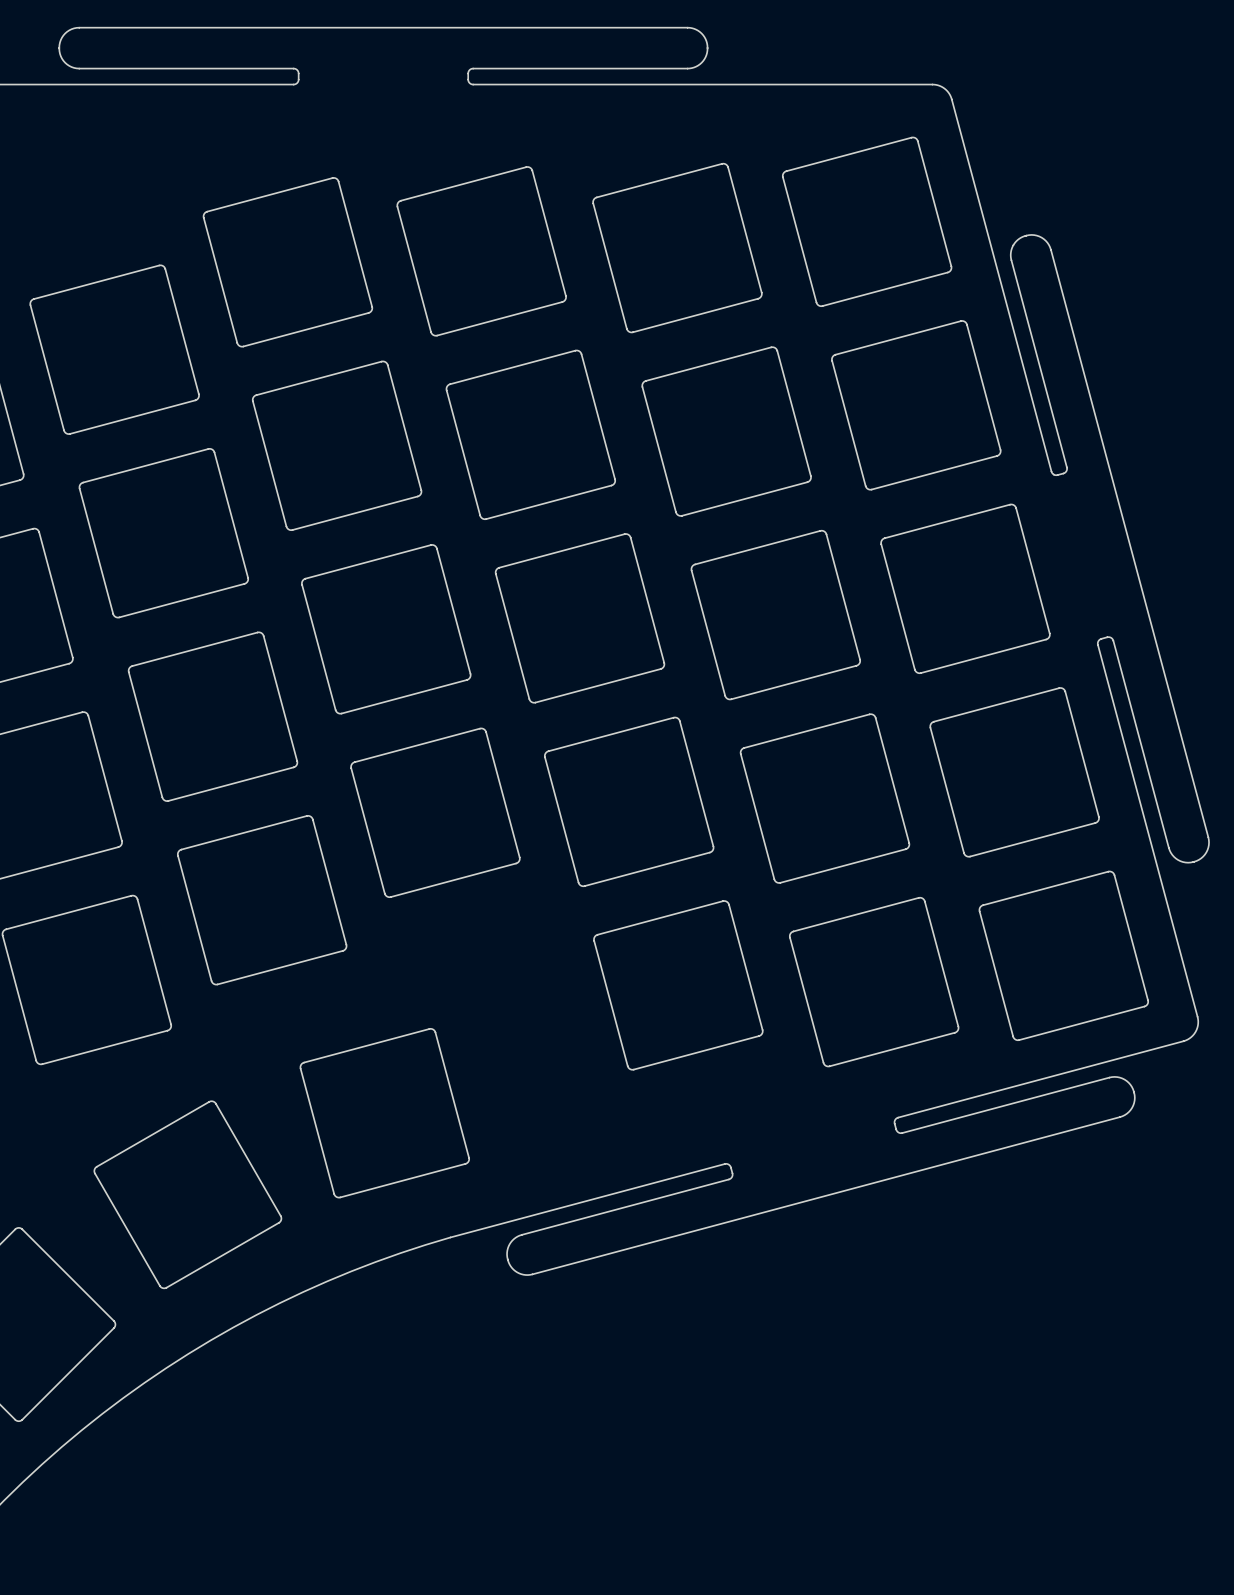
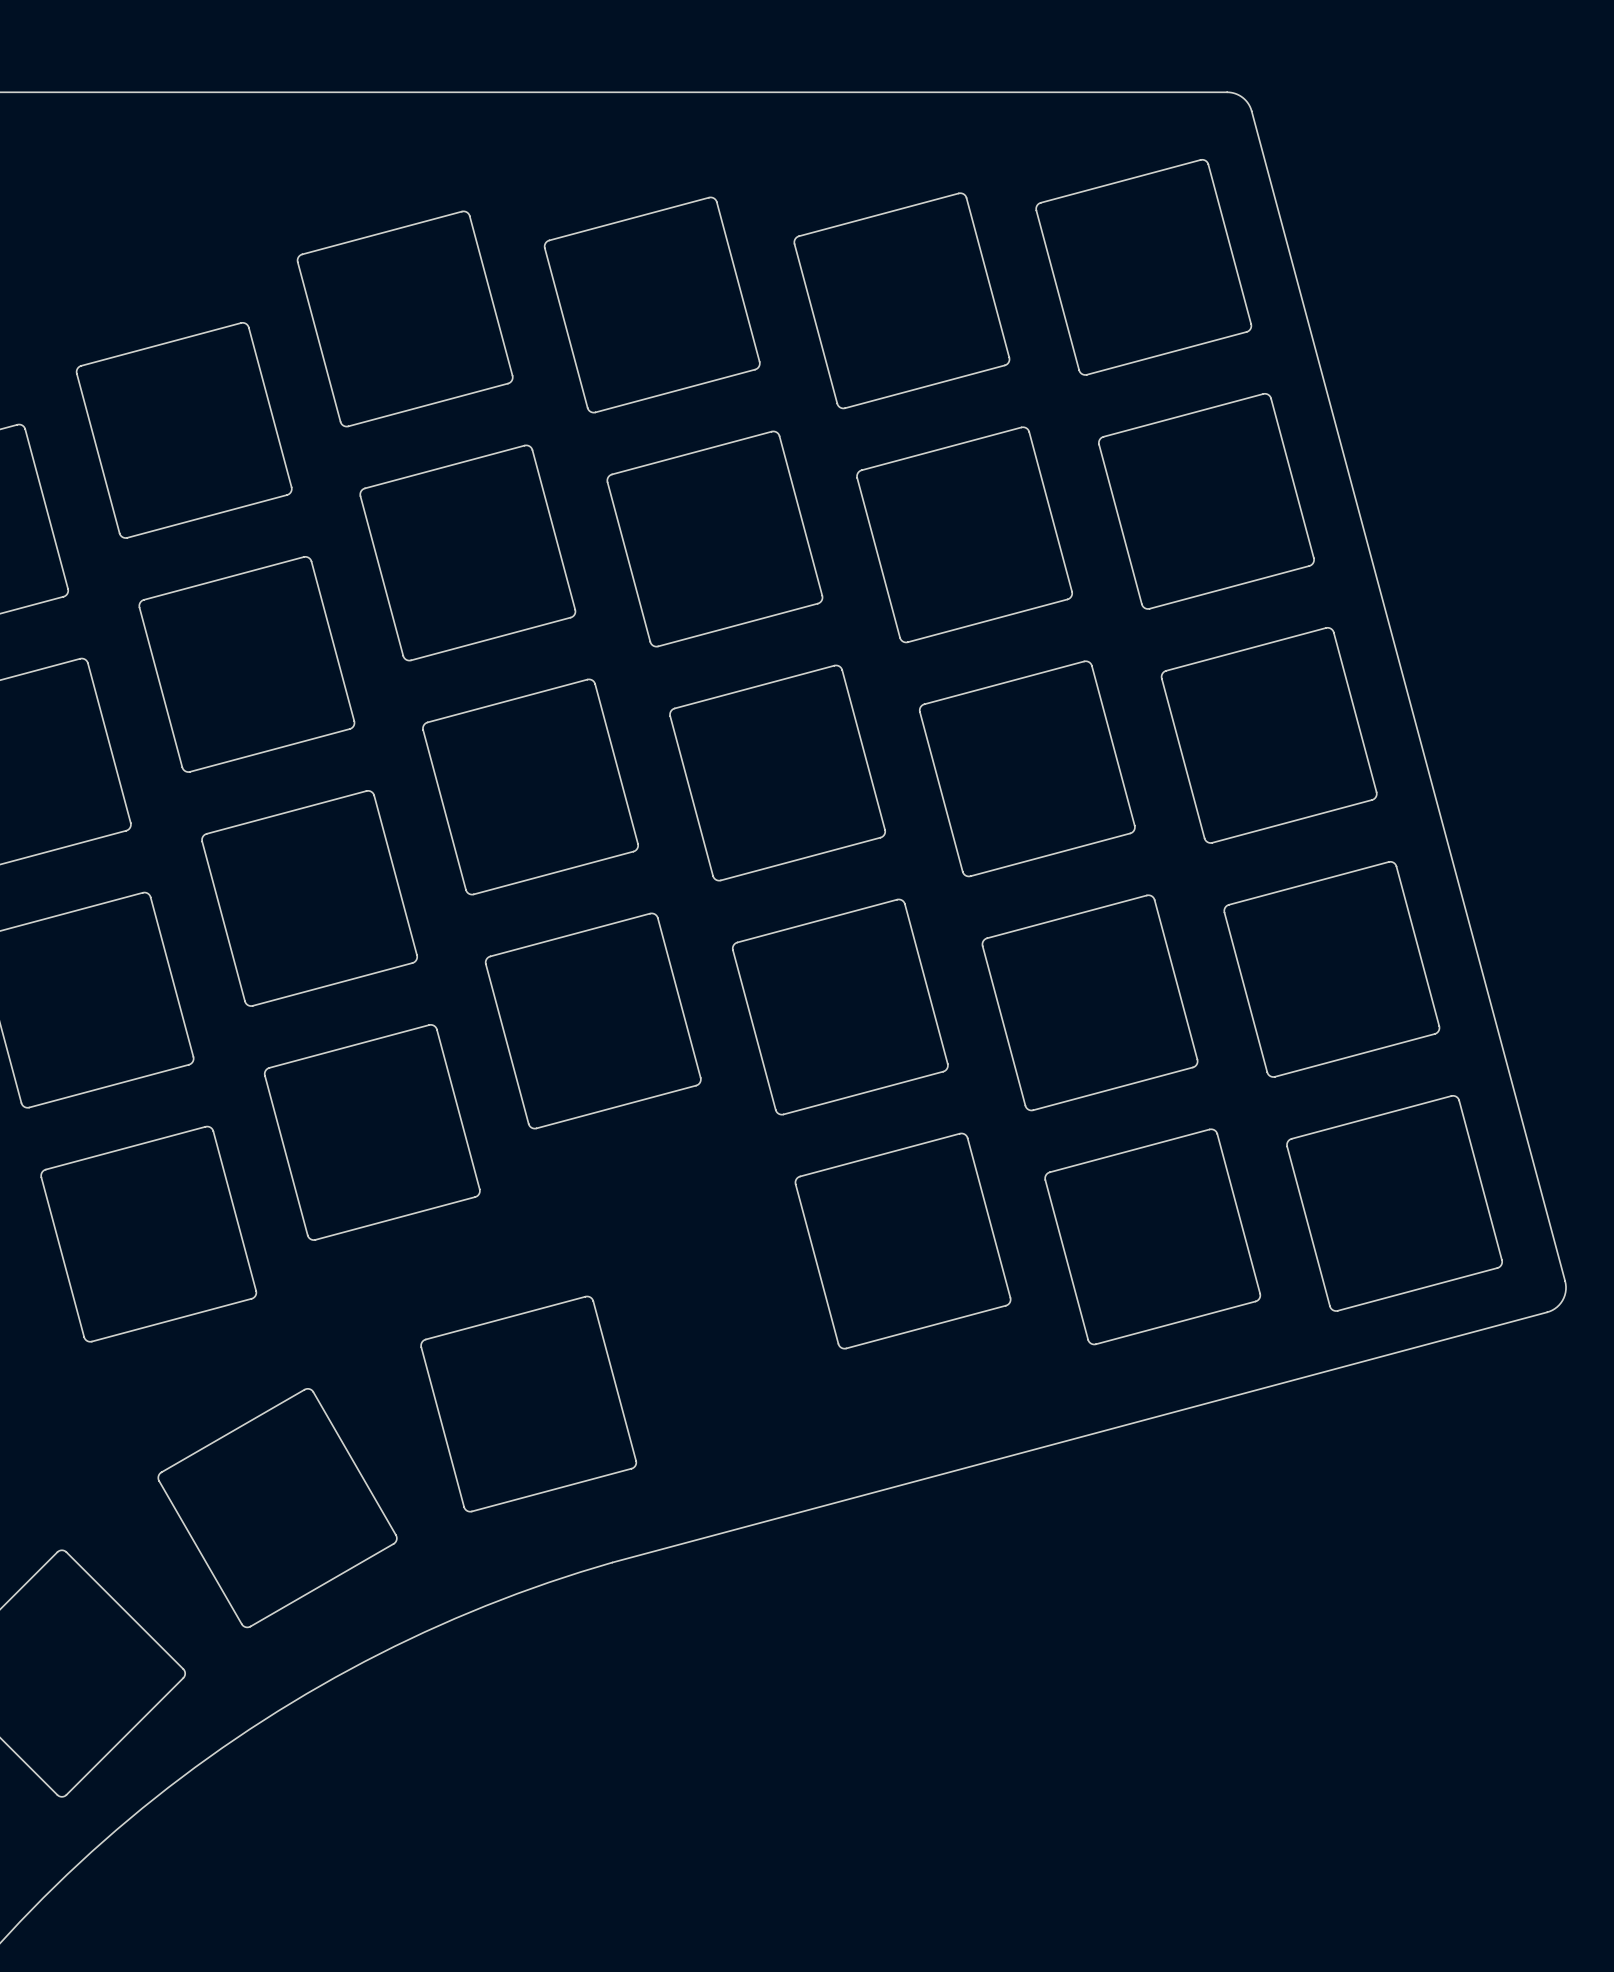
board edge: (473, 84) (468, 79) (468, 71) (472, 68) (692, 68) (704, 59) (707, 50) (707, 43) (700, 32) (687, 27) (79, 27) (67, 31) (61, 37) (59, 45) (59, 53) (63, 60) (69, 65) (76, 68) (294, 68) (298, 71) (298, 79) (293, 84) -> (641, 92) (412, 92)
board edge: (1051, 471) (1057, 475) (1065, 472) (1067, 468) (1010, 257) (1011, 249) (1015, 242) (1020, 237) (1029, 235) (1041, 237) (1047, 242) (1050, 249) (1208, 837) (1208, 845) (1206, 852) (1196, 860) (1188, 862) (1180, 861) (1174, 856) (1169, 850) (1113, 640) (1109, 637) (1101, 638) (1097, 644) -> (1378, 585) (1438, 806)
board edge: (898, 1117) (894, 1123) (897, 1131) (901, 1133) (1112, 1077) (1119, 1077) (1126, 1081) (1131, 1086) (1134, 1095) (1134, 1102) (1130, 1109) (1120, 1117) (532, 1274) (519, 1273) (509, 1264) (507, 1257) (507, 1248) (517, 1236) (729, 1179) (732, 1175) (730, 1167) (724, 1164) -> (1183, 1409) (962, 1468)

